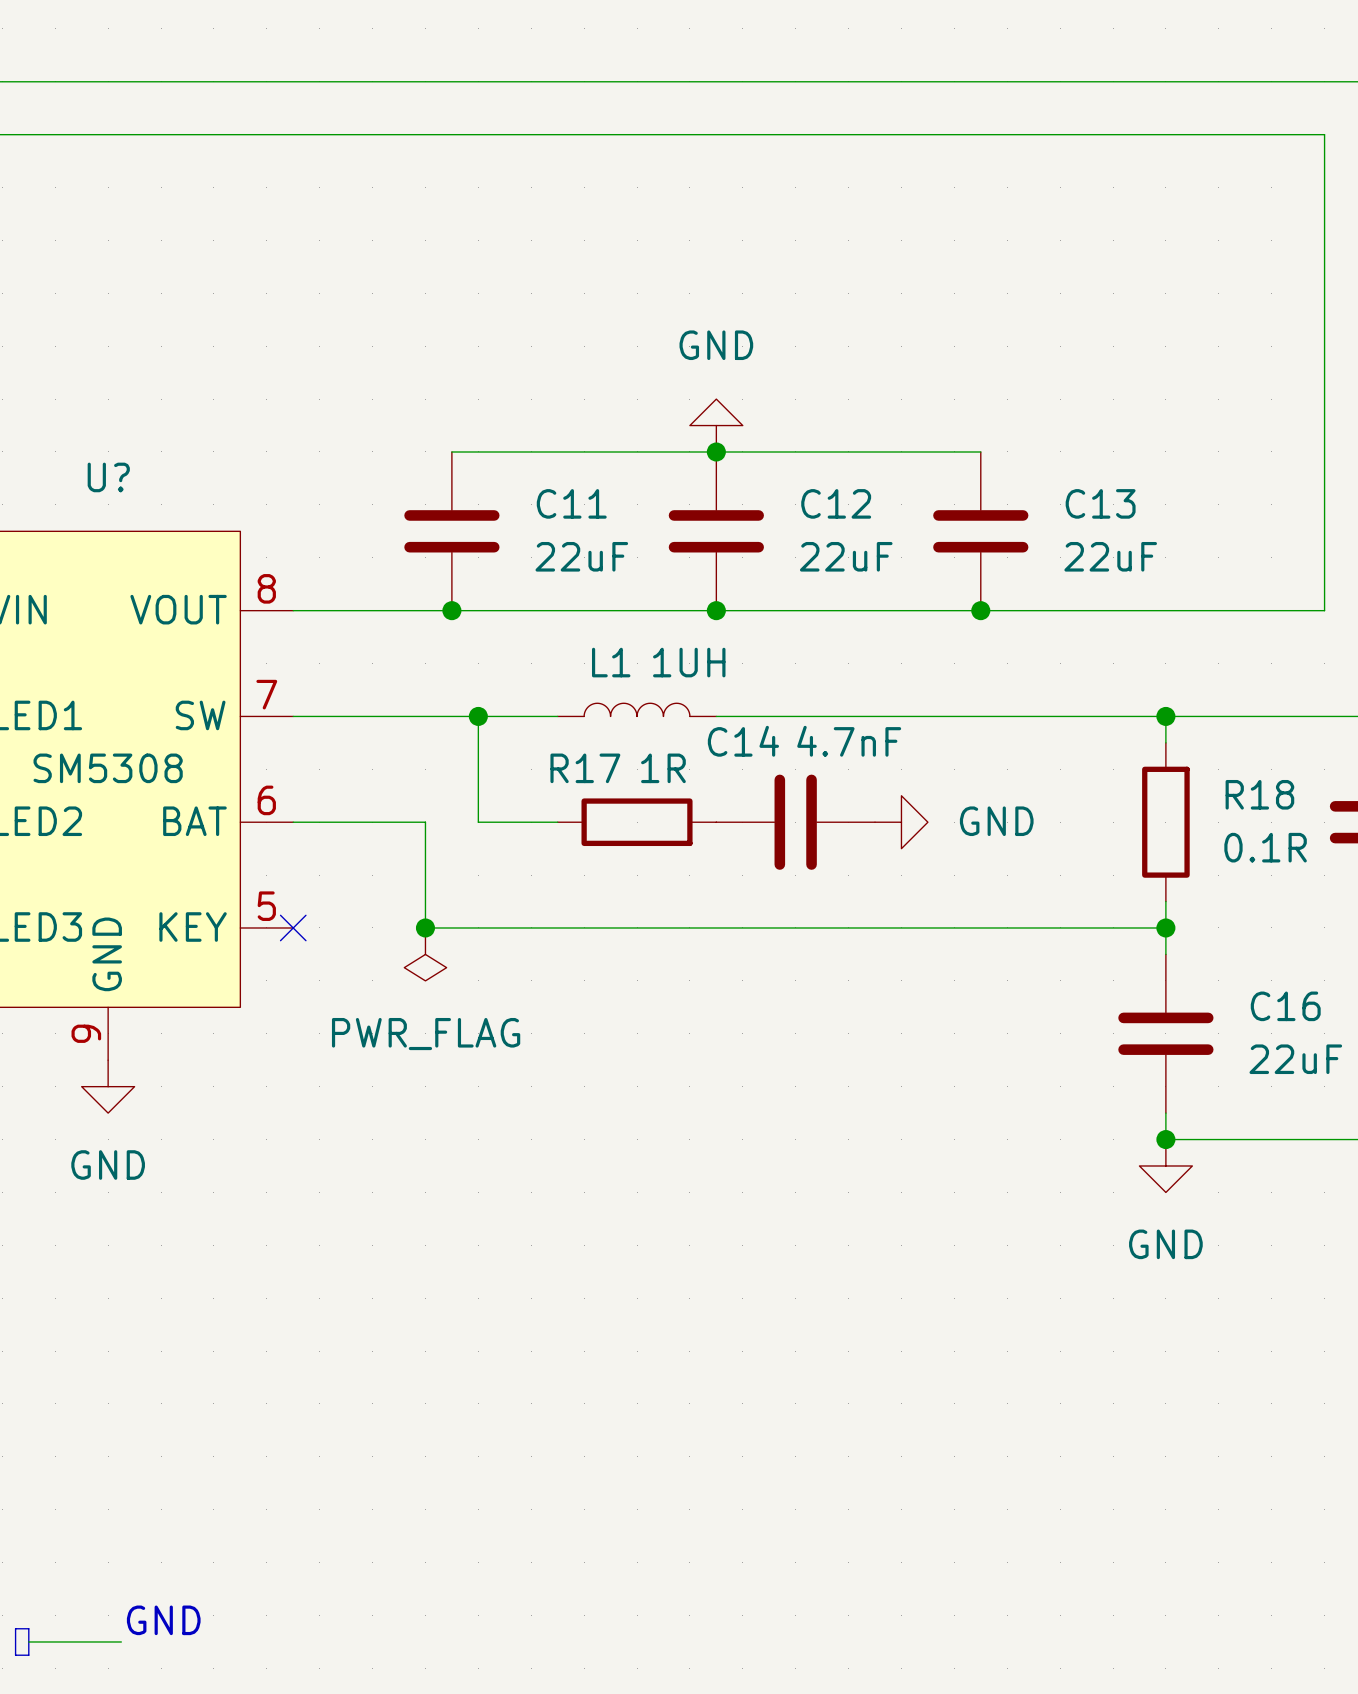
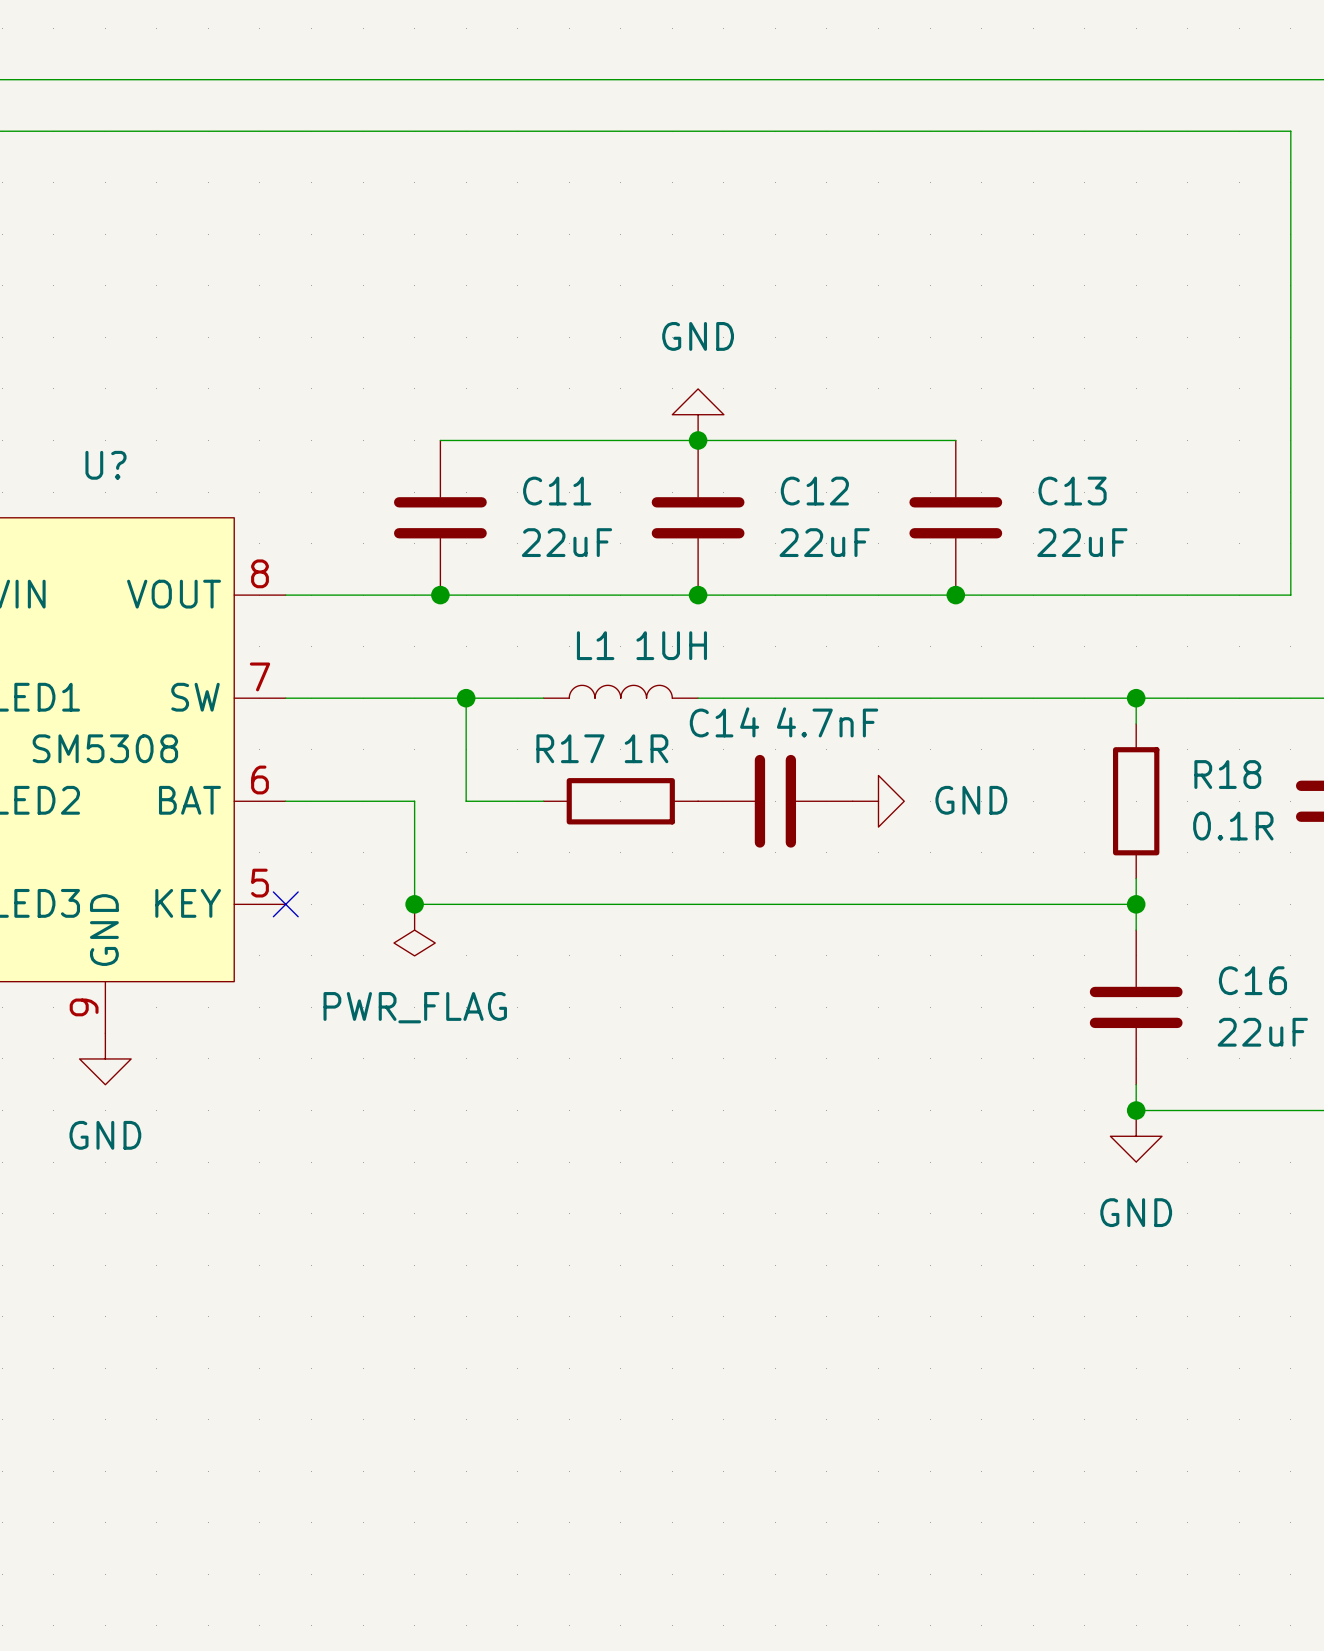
text: GND (163, 1620) -> none
line: (15, 1628) (28, 1628) (28, 1655) (15, 1655) (15, 1628) -> none
wire: (28, 1641) (121, 1641) -> none

